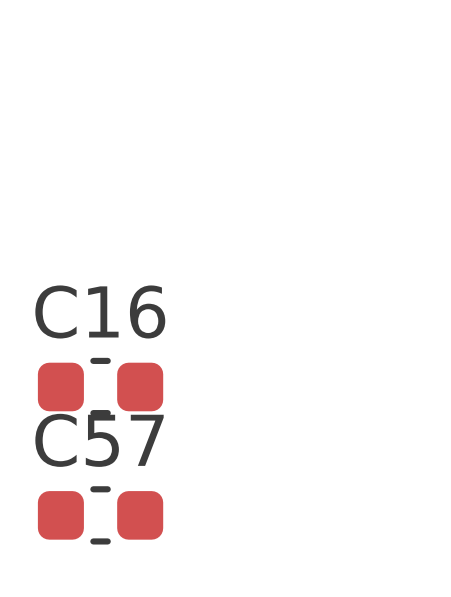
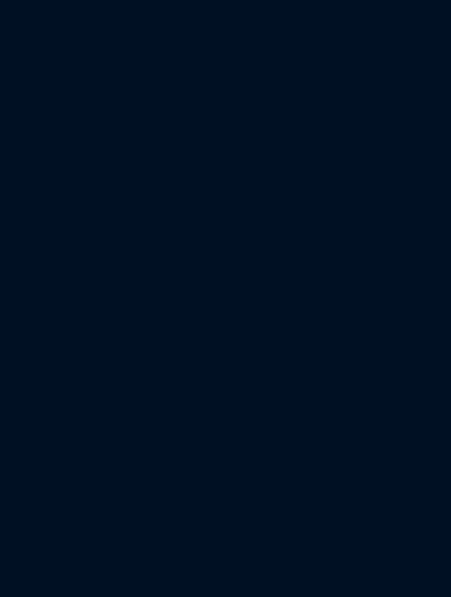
C16: (100, 386) -> none
C57: (100, 515) -> none

